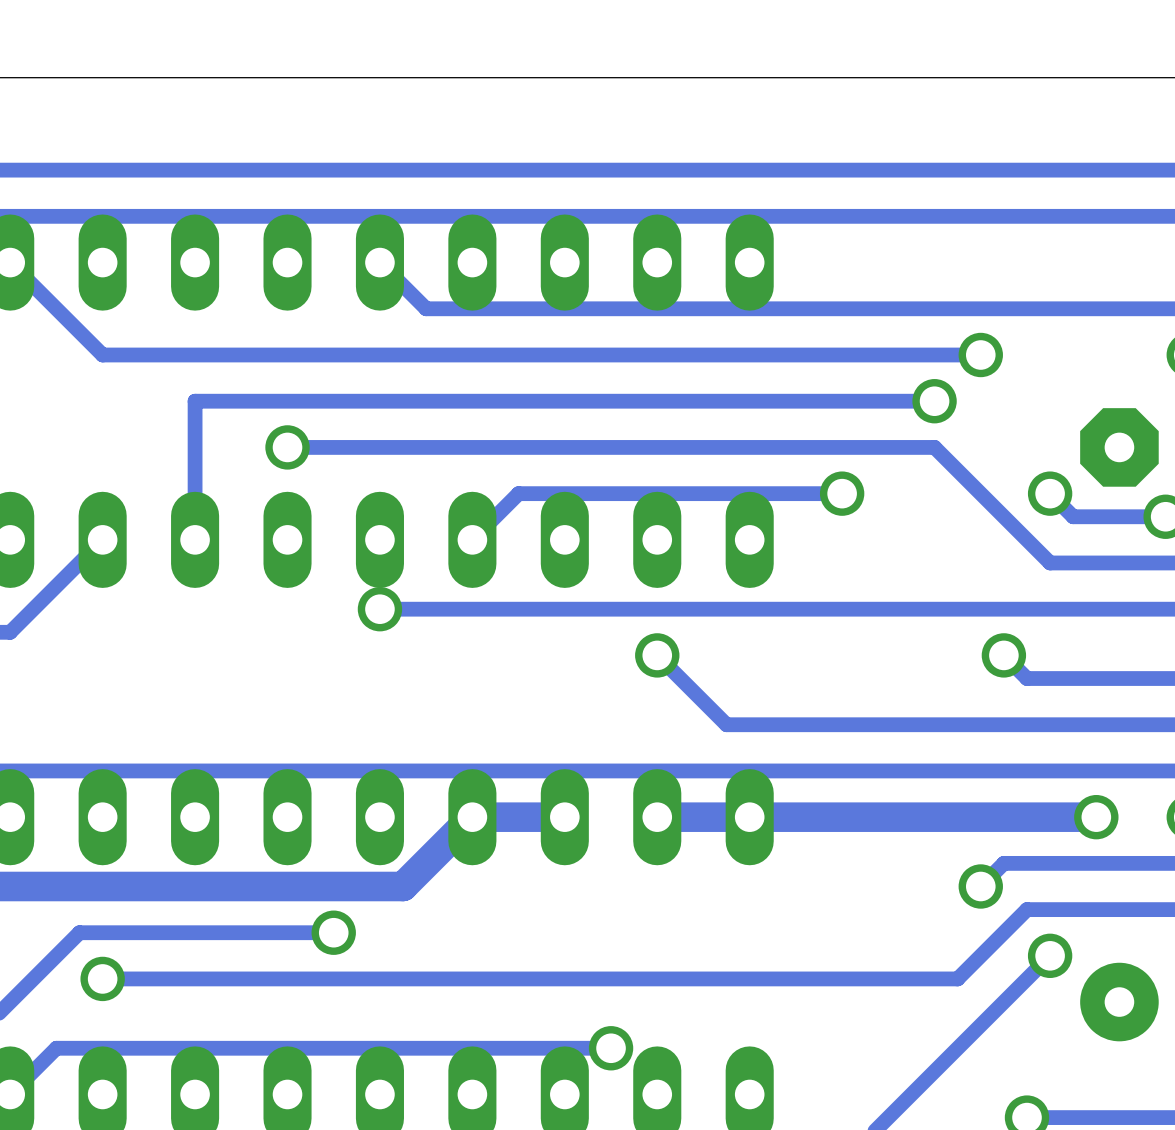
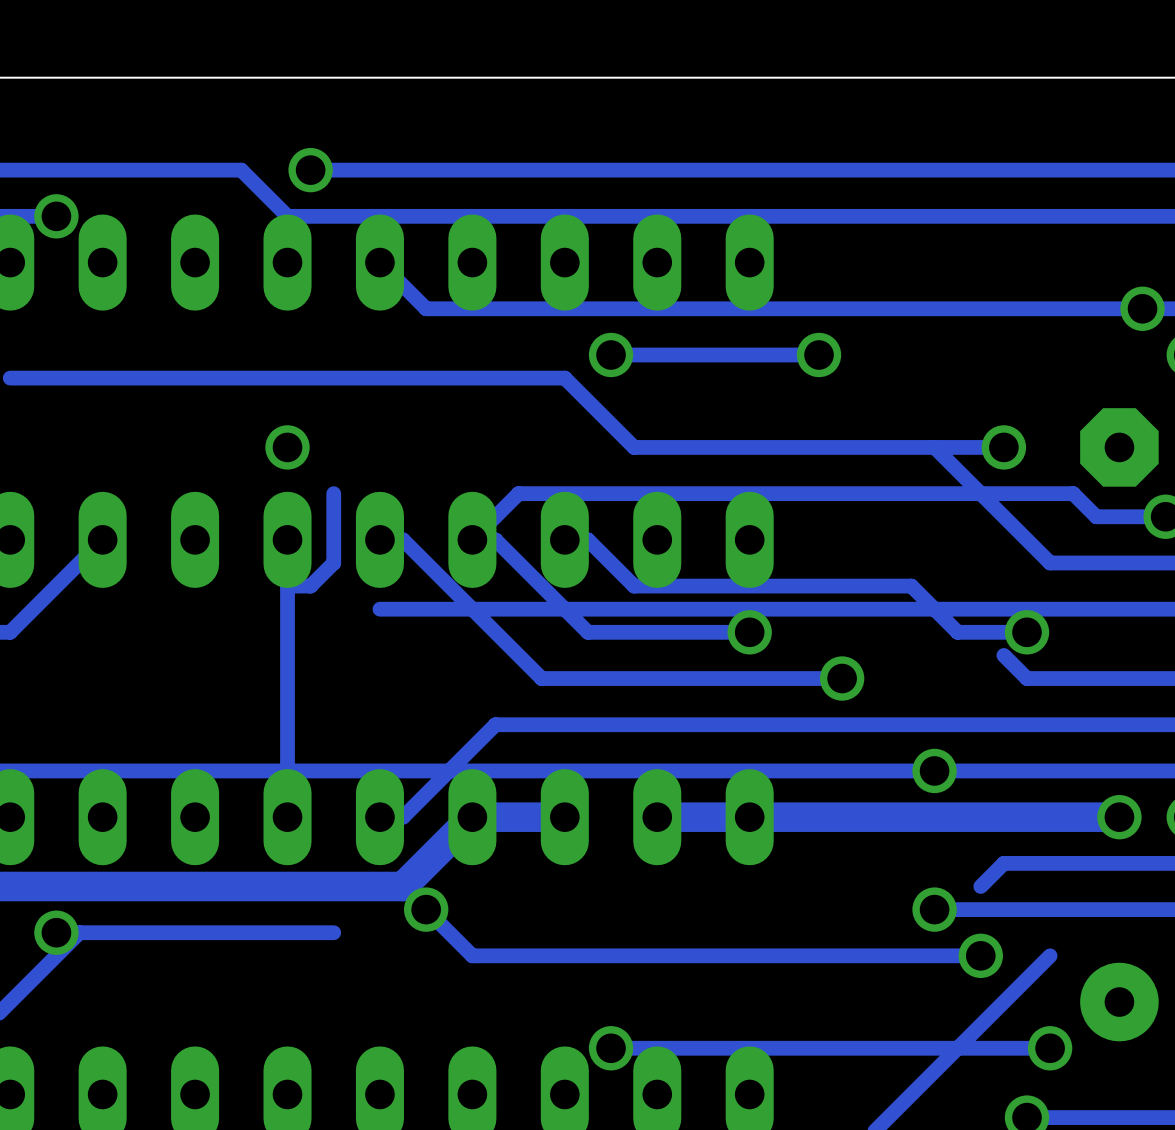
track: (310, 170) (241, 170) -> (287, 216) (241, 170)
via: none -> (310, 170)
via: none -> (56, 216)
track: (287, 216) (56, 216) -> none
track: (10, 262) (102, 354) (611, 354) -> none
via: none -> (1142, 308)
via: none -> (611, 354)
via: none -> (819, 354)
track: (980, 354) (819, 354) -> none
via: (980, 354) -> none
track: (934, 401) (195, 401) (195, 539) -> none
via: (934, 401) -> none
track: (634, 447) (287, 447) -> (634, 447) (564, 378) (10, 378)
track: none -> (1003, 447) (934, 447)
via: none -> (1003, 447)
track: none -> (333, 493) (333, 562) (310, 586) (287, 586) (287, 817)
via: (842, 493) -> none
track: (1050, 493) (1073, 516) (1096, 516) -> (842, 493) (1073, 493) (1096, 516)
via: (1050, 493) -> none
track: none -> (379, 539) (403, 539) (541, 678) (842, 678)
track: none -> (472, 539) (495, 539) (587, 632) (749, 632)
track: none -> (564, 539) (587, 539) (634, 586) (911, 586) (957, 632) (1027, 632)
via: (379, 609) -> none
via: none -> (749, 632)
track: (657, 655) (726, 724) -> (379, 817) (403, 817) (495, 724) (726, 724)
via: (657, 655) -> none
via position: (1003, 655) -> (1027, 632)
via: none -> (842, 678)
via: none -> (934, 770)
via position: (1096, 817) -> (1119, 817)
via: (980, 886) -> none
track: none -> (426, 909) (472, 955) (980, 955)
via: none -> (934, 909)
track: (1027, 909) (957, 978) (102, 978) -> (1027, 909) (934, 909)
via position: (333, 932) -> (426, 909)
via: none -> (980, 955)
via: (1050, 955) -> none
via position: (102, 978) -> (56, 932)
track: (611, 1048) (56, 1048) (10, 1094) -> (611, 1048) (1050, 1048)
via: none -> (1050, 1048)

